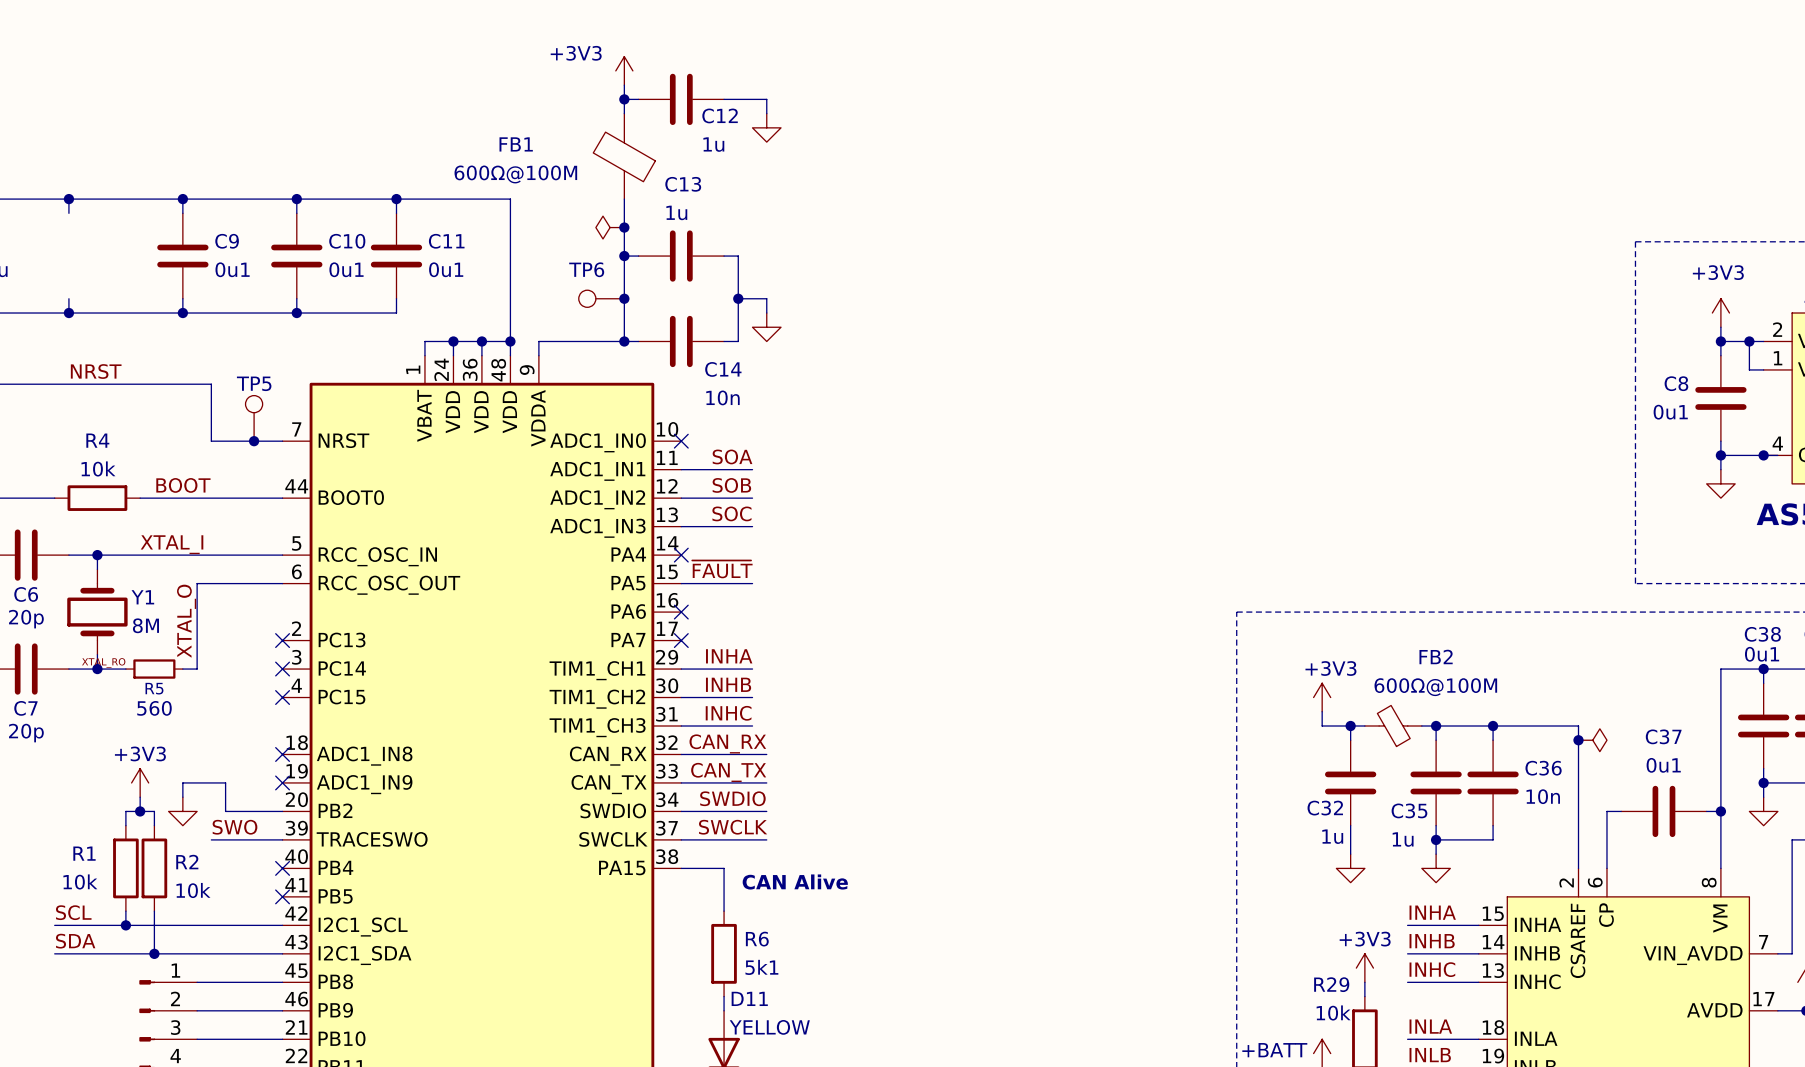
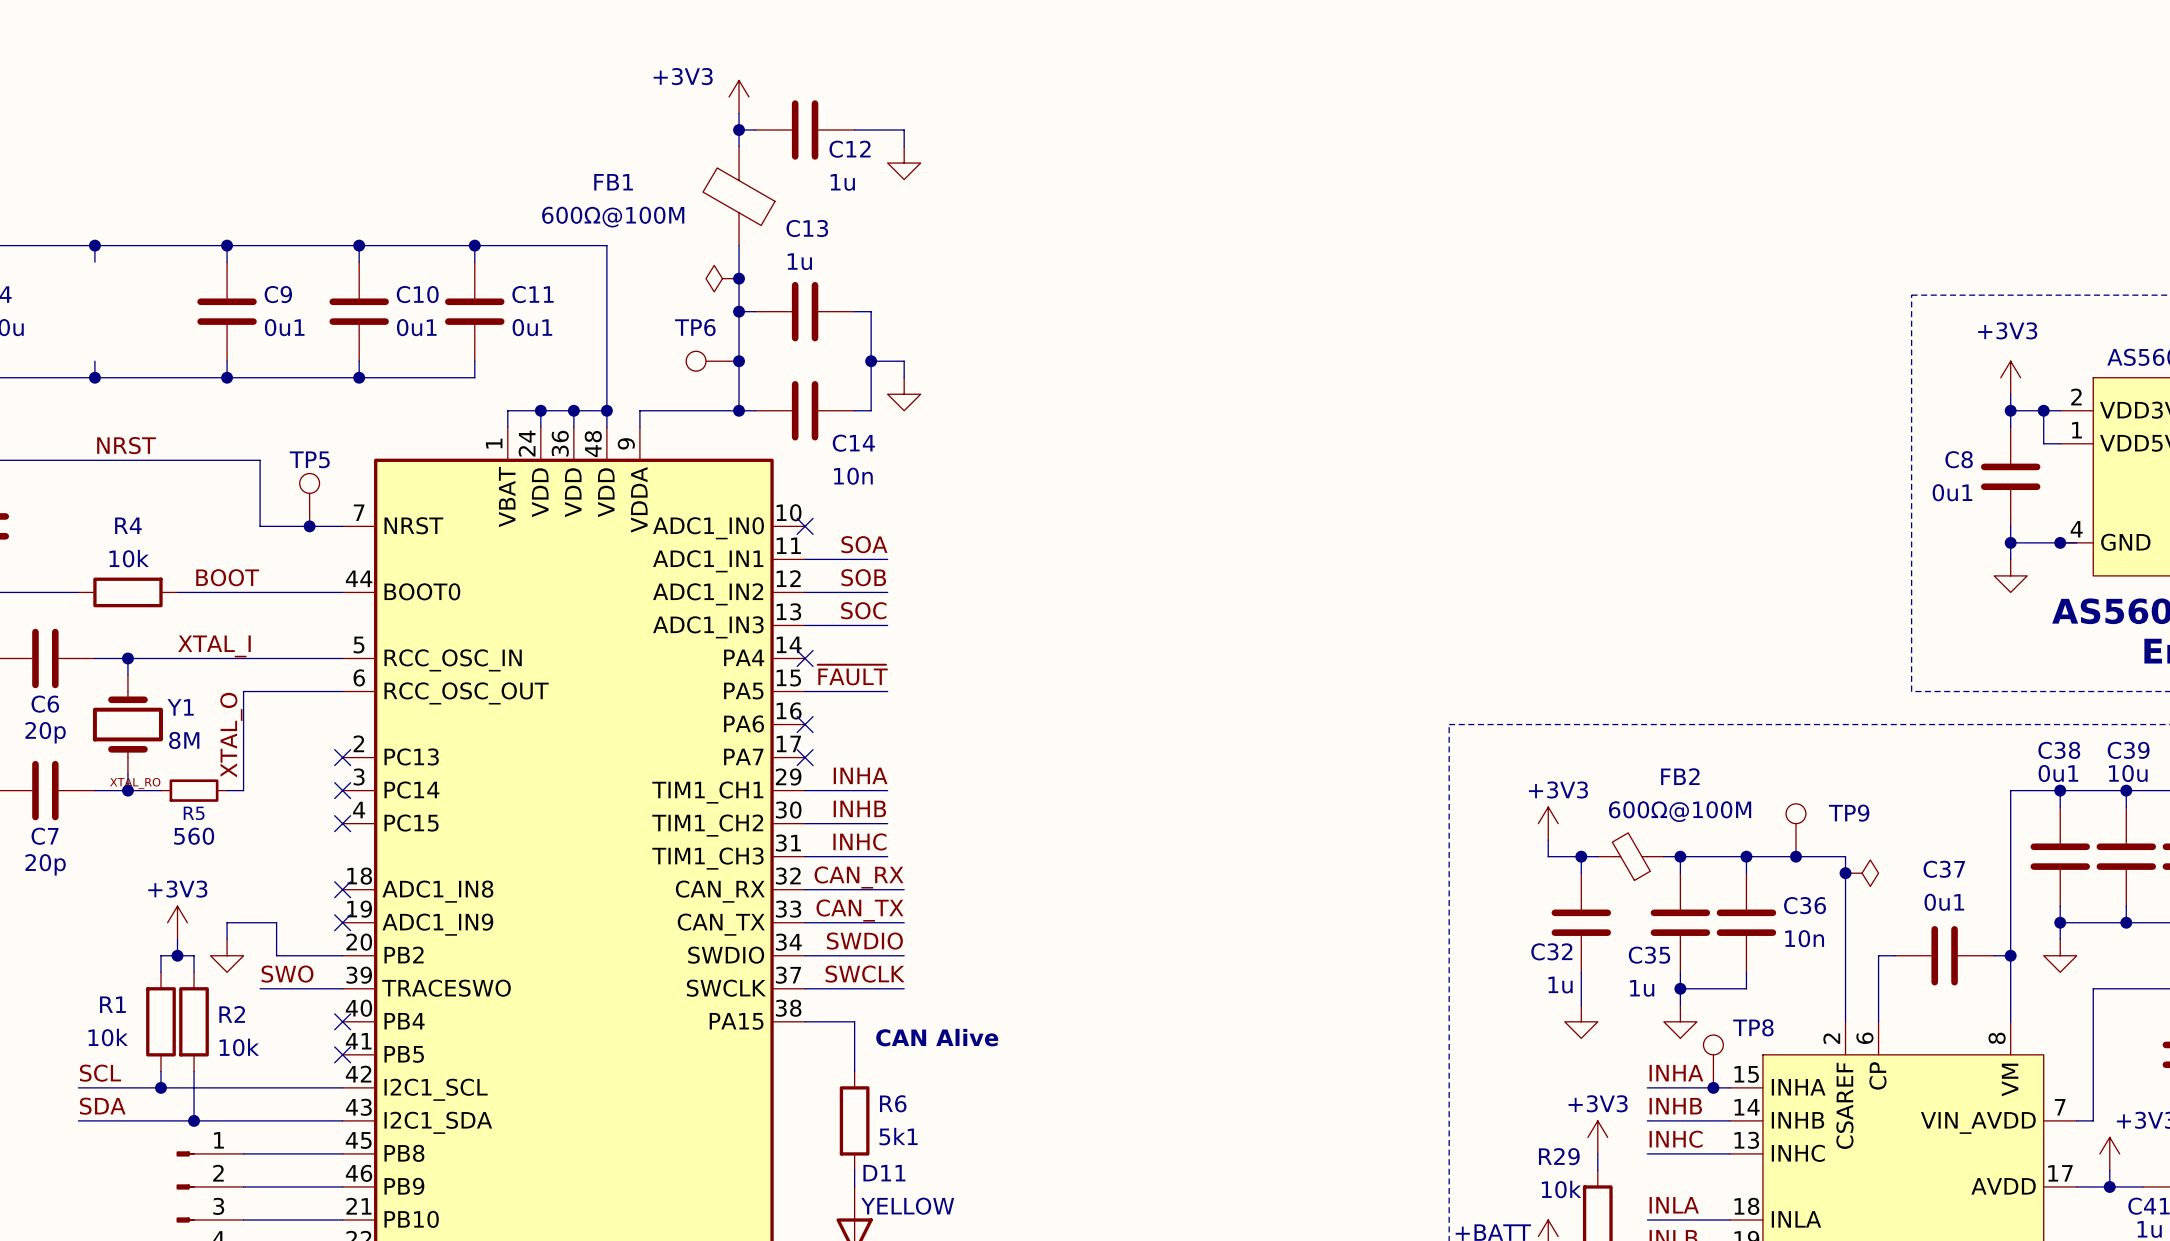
TP9: none -> (1795, 830)
junction: none -> (1795, 856)
TP8: none -> (1713, 1061)
junction: none -> (1713, 1087)

